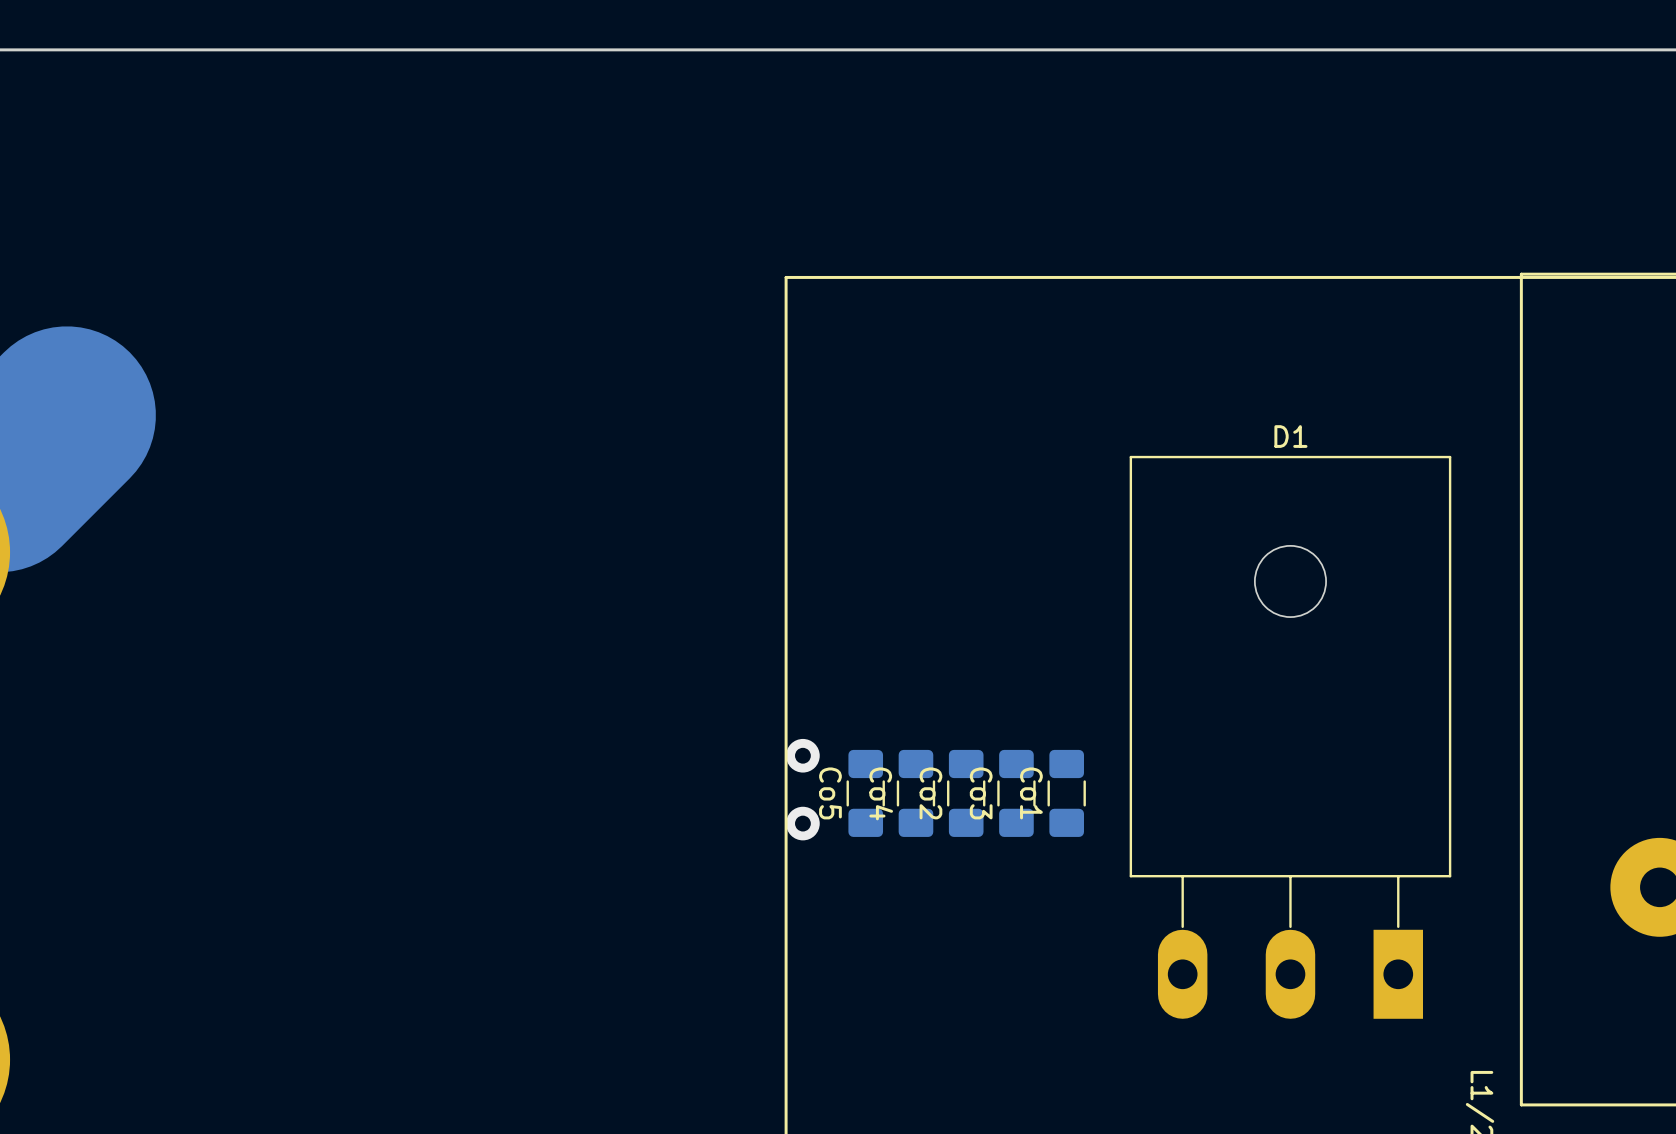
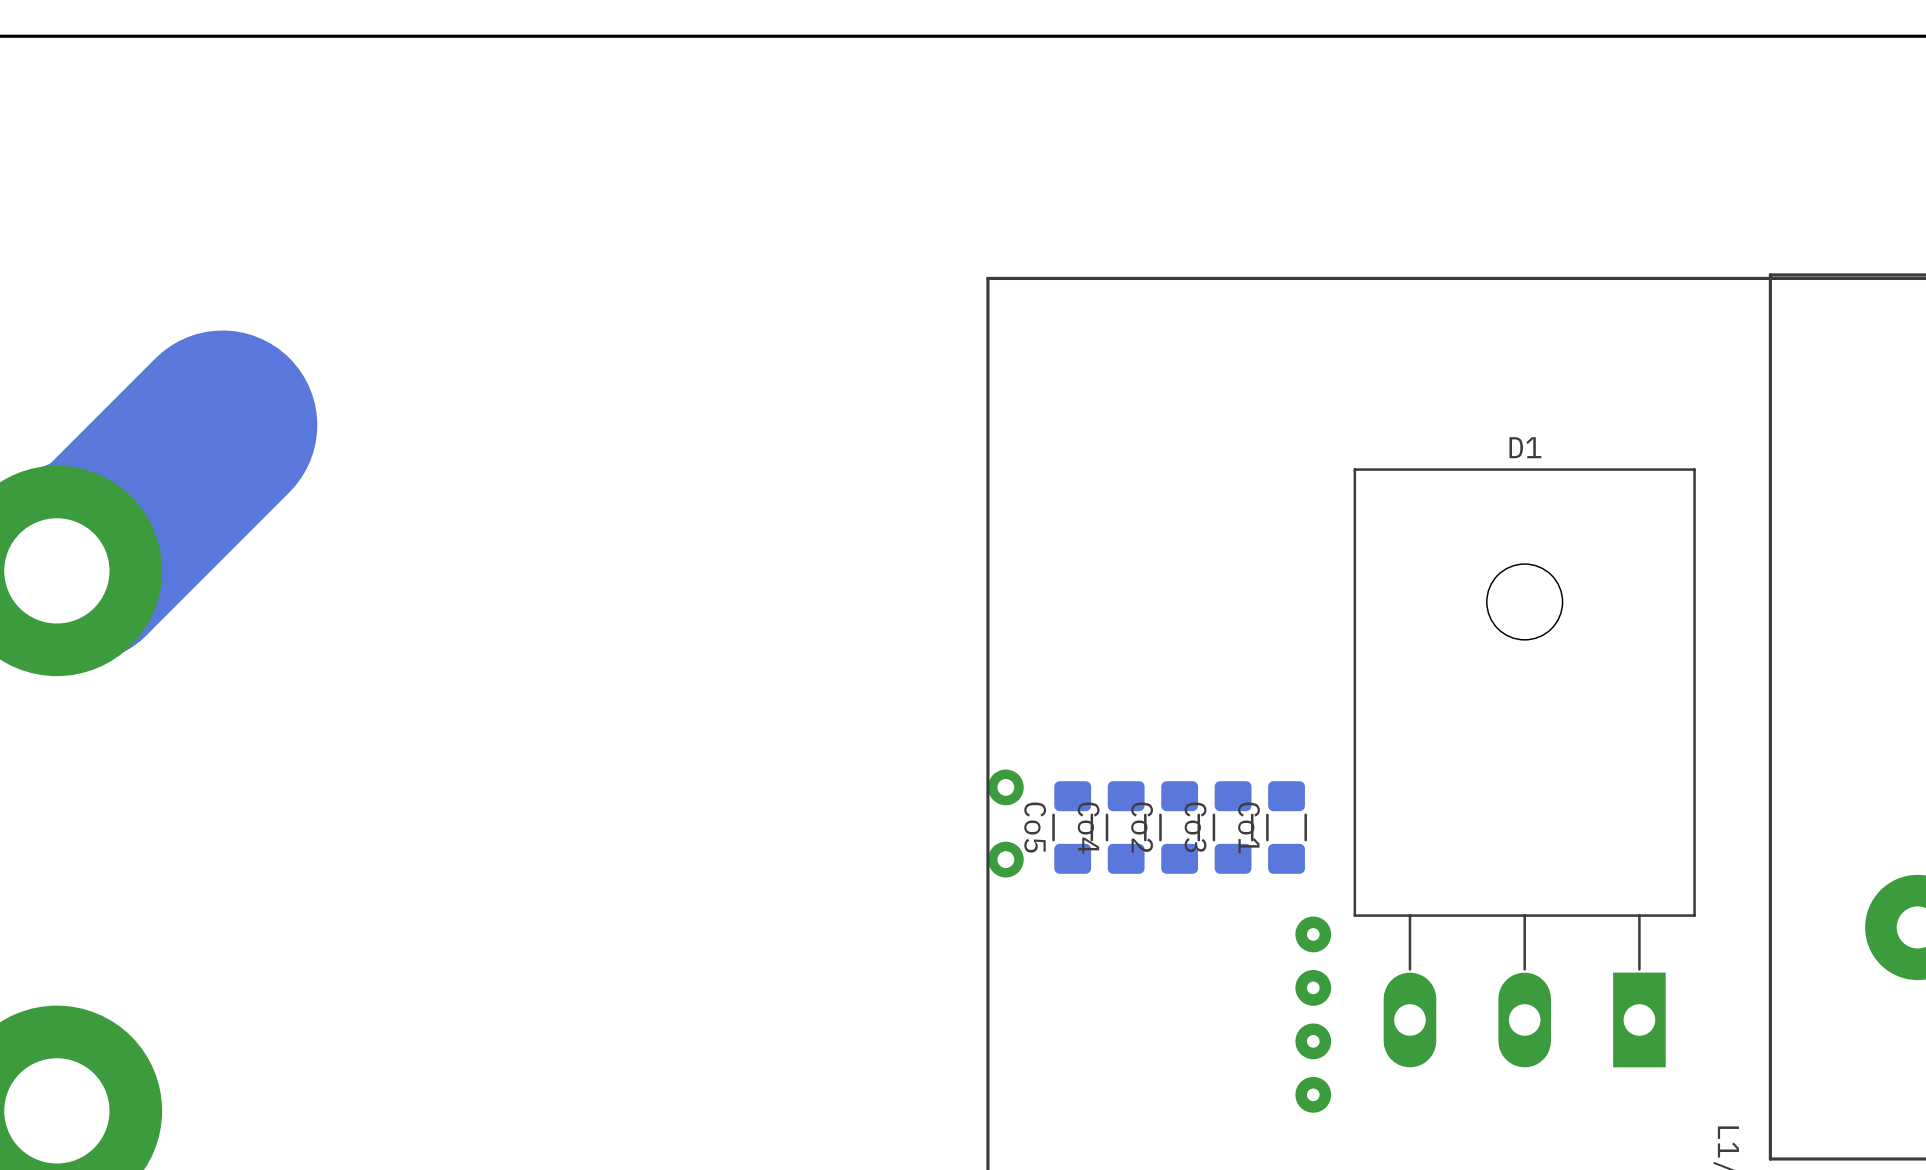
via: none -> (1313, 934)
via: none -> (1313, 987)
via: none -> (1313, 1041)
via: none -> (1313, 1094)

